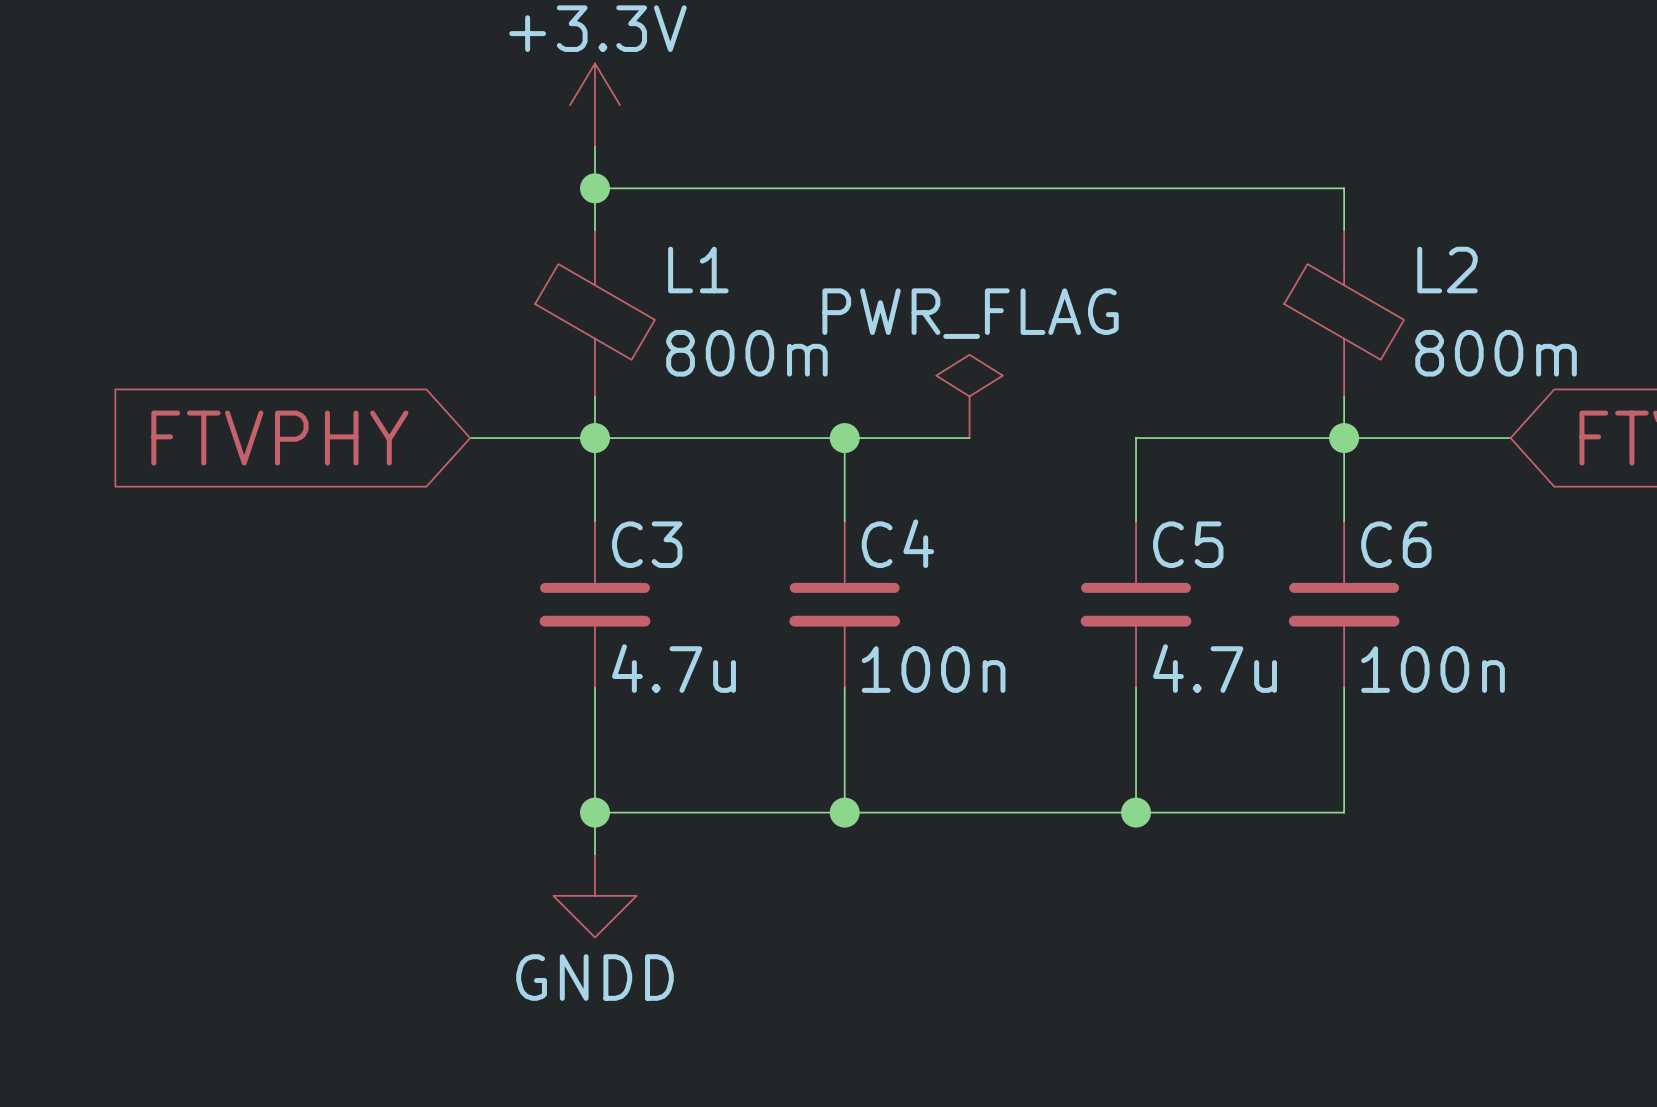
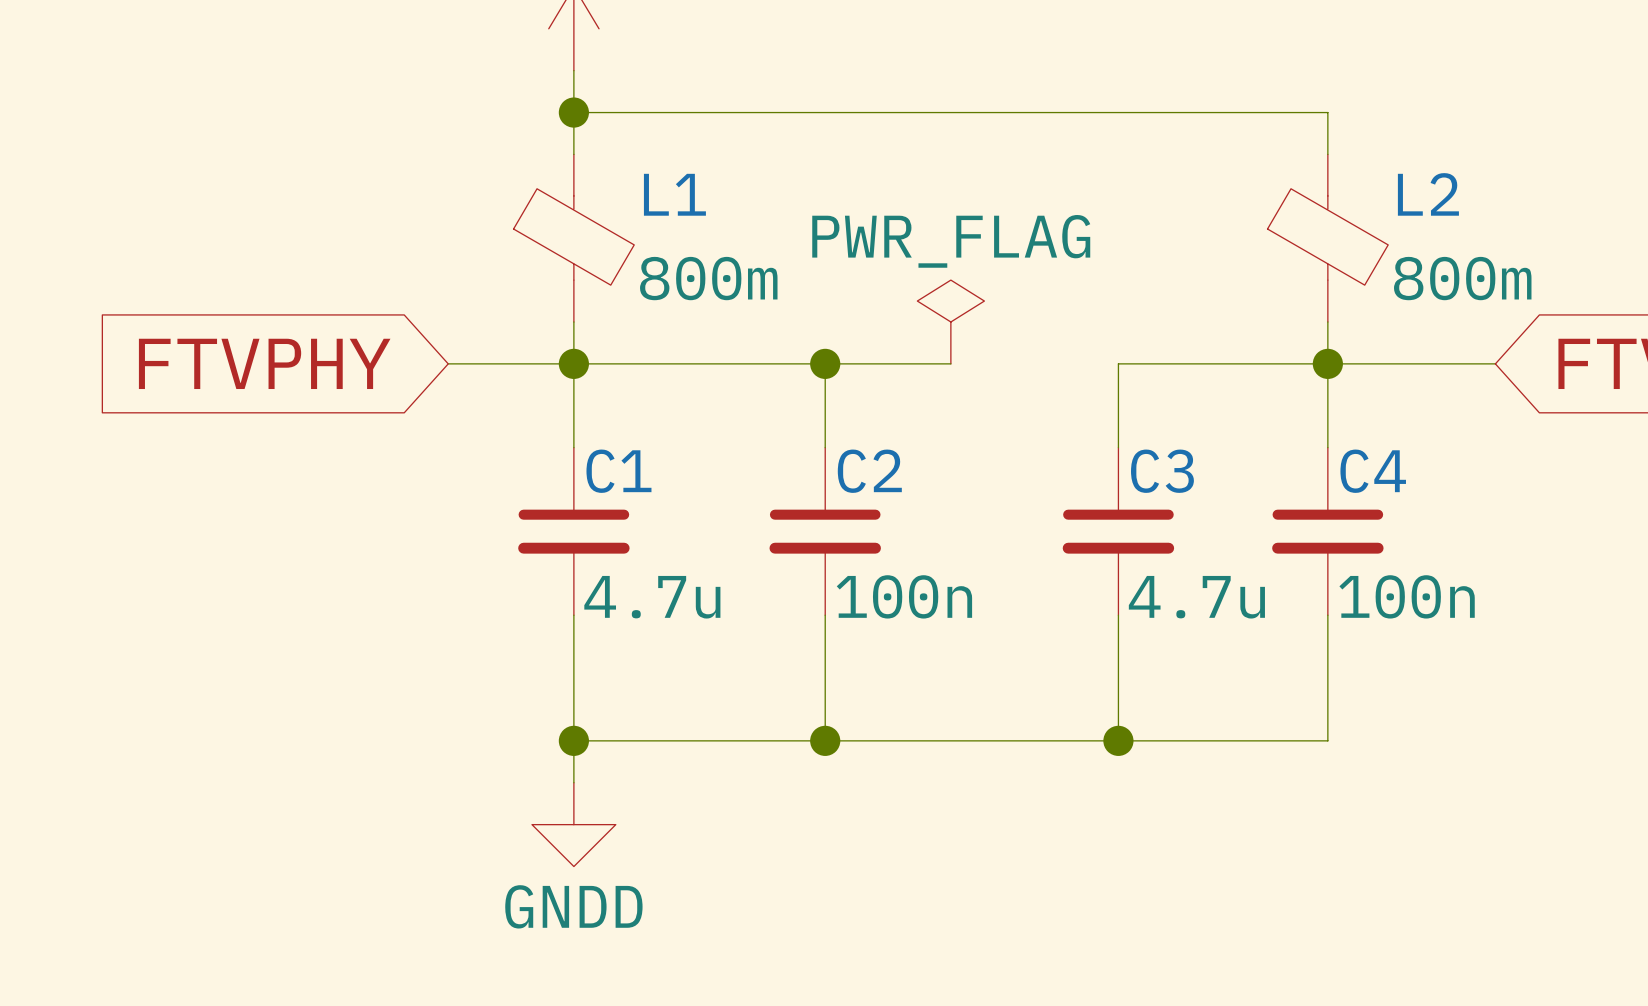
C4 name: C4 (897, 543) -> C2 (869, 471)
C3 name: C3 (647, 544) -> C1 (618, 471)
C5 name: C5 (1188, 544) -> C3 (1162, 471)
C6 name: C6 (1396, 544) -> C4 (1373, 471)

